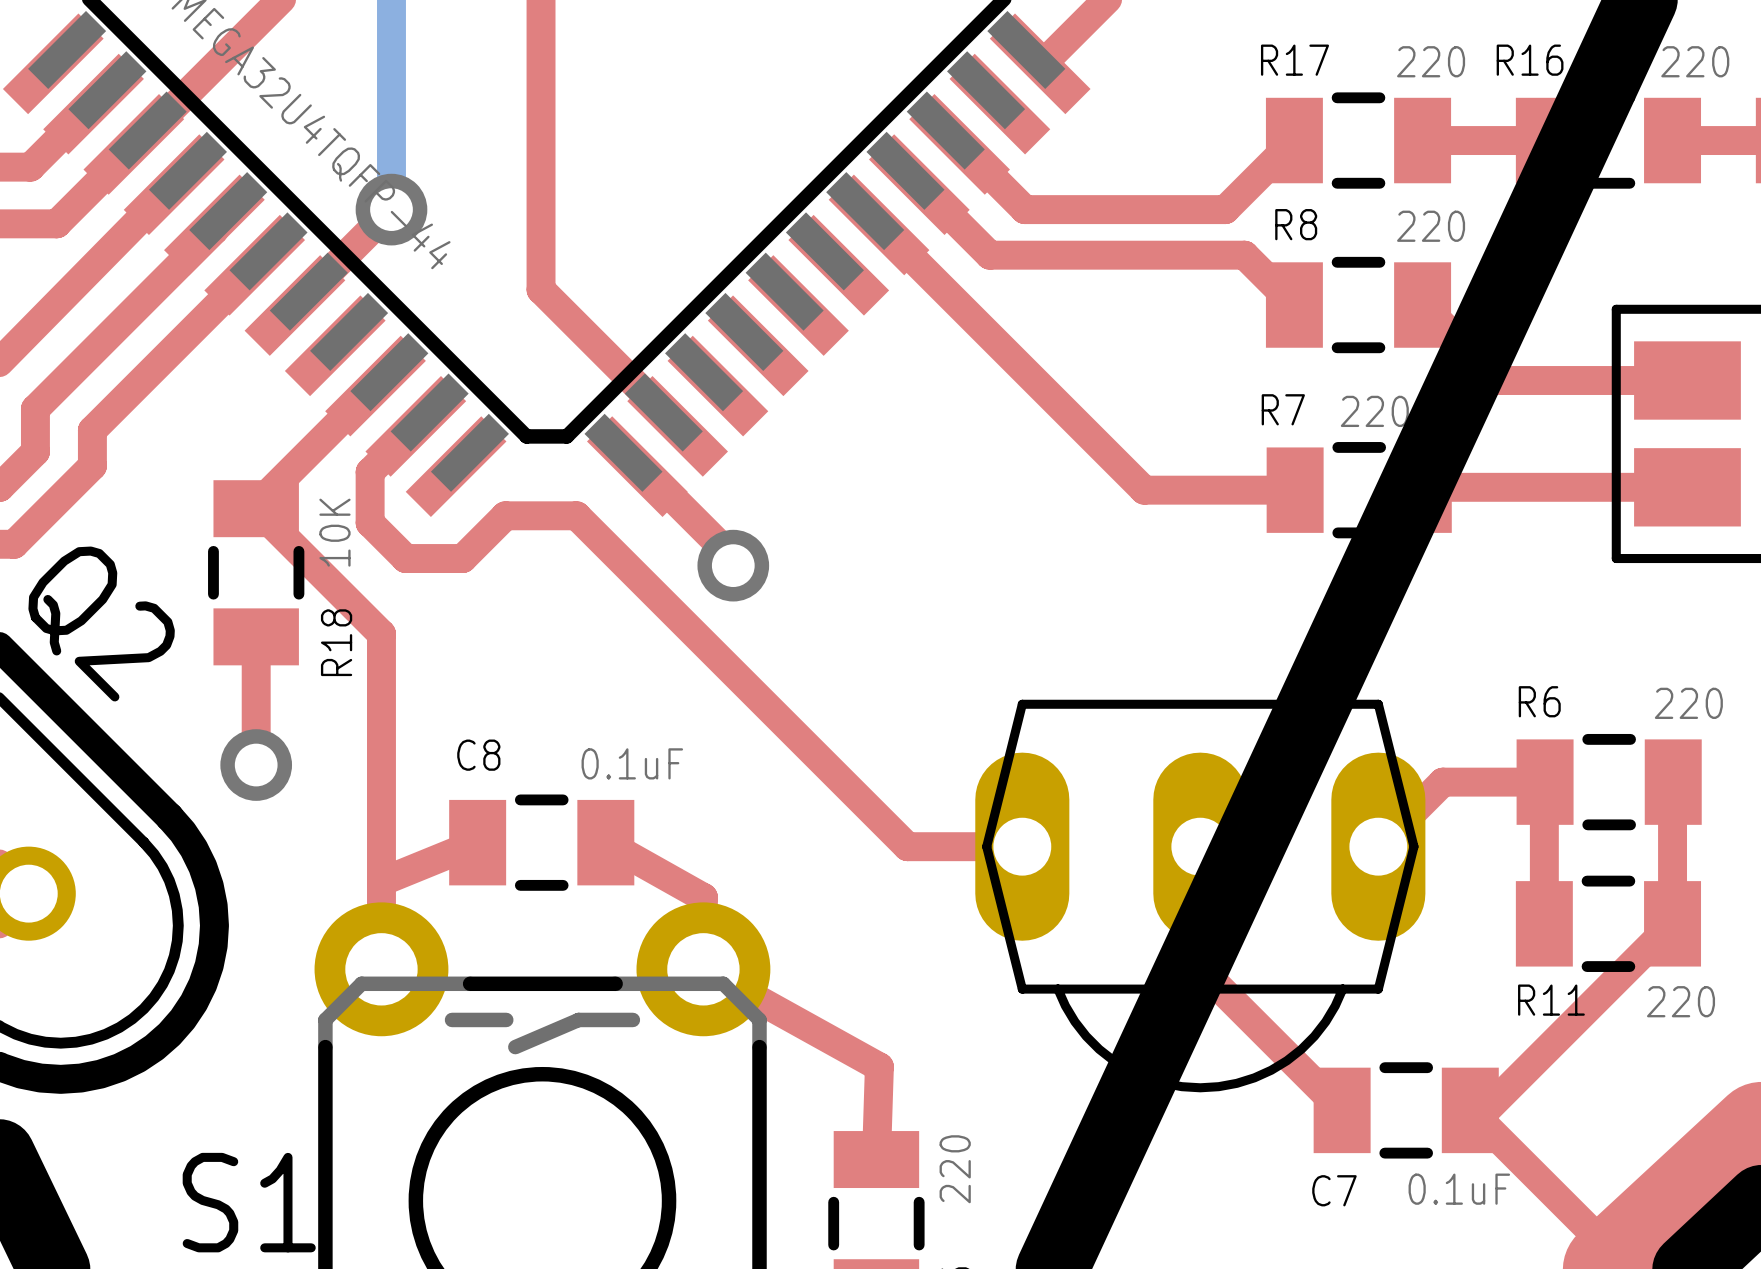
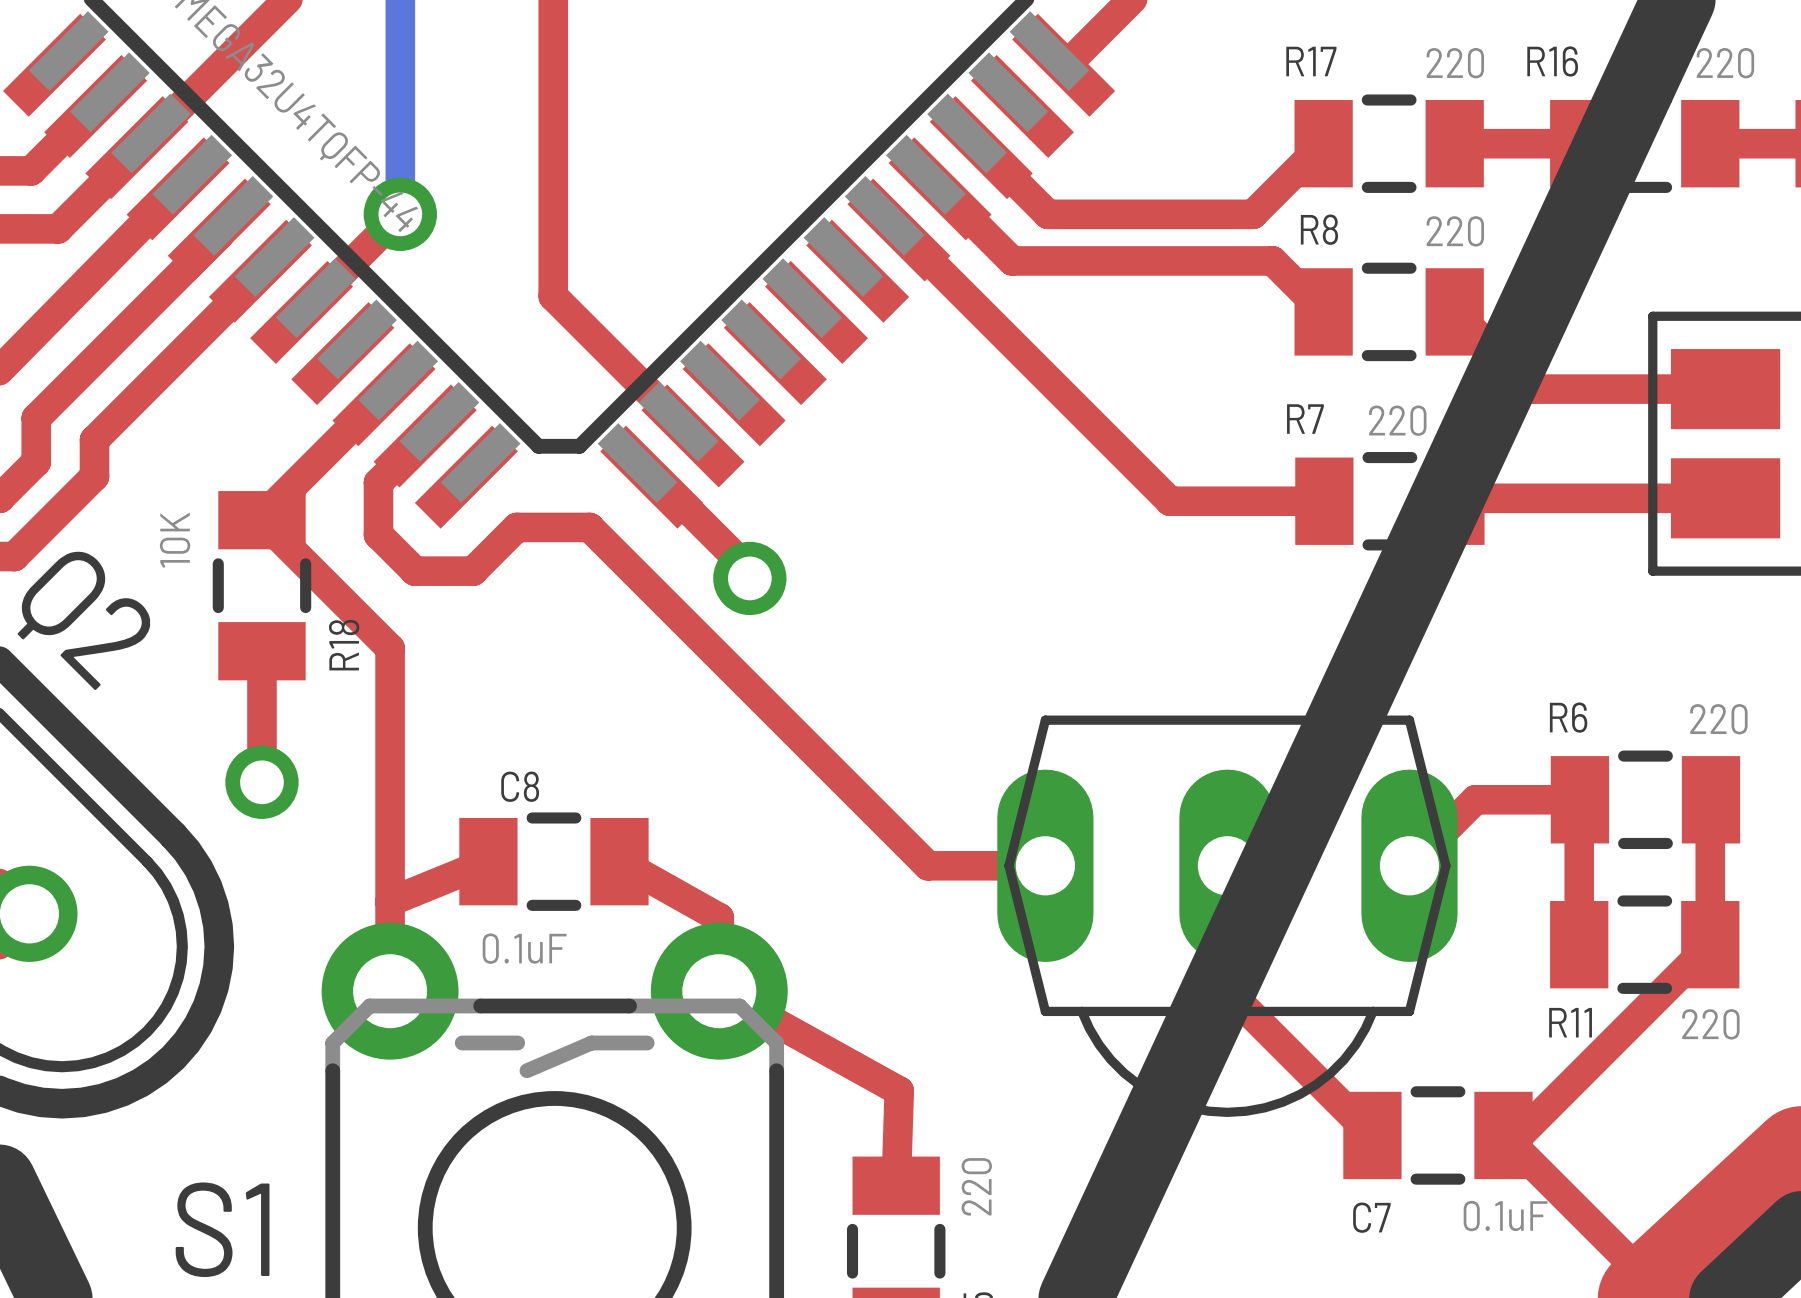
R18 value position: 10K (334, 532) -> 10K (175, 540)
C8 name position: C8 (478, 755) -> C8 (520, 786)
C8 value position: 0.1uF (632, 763) -> 0.1uF (524, 948)

